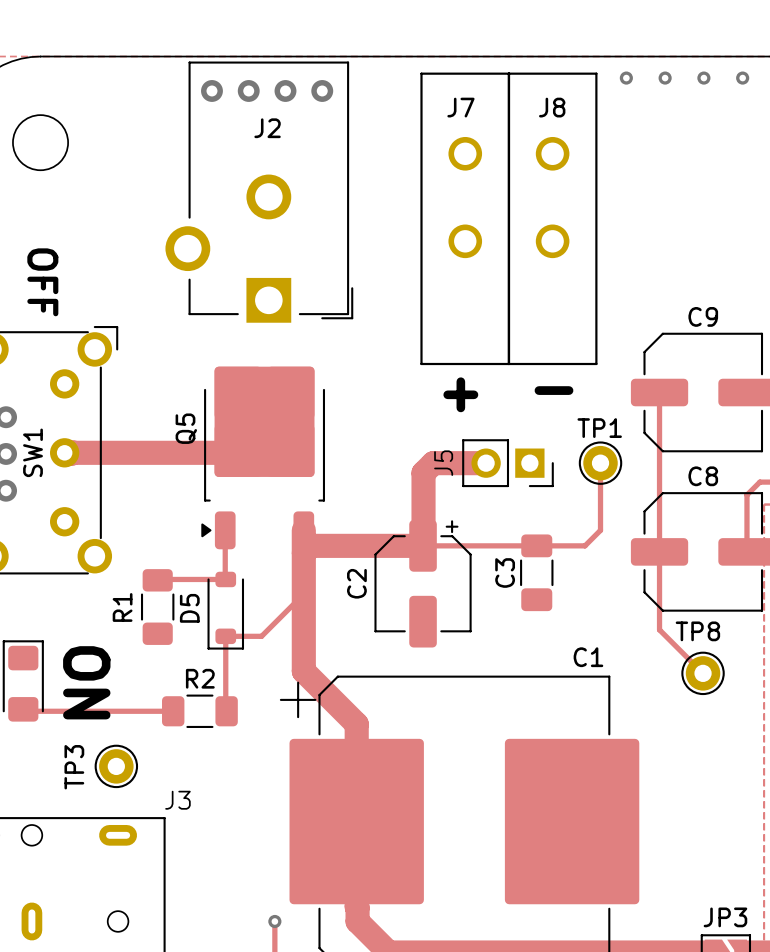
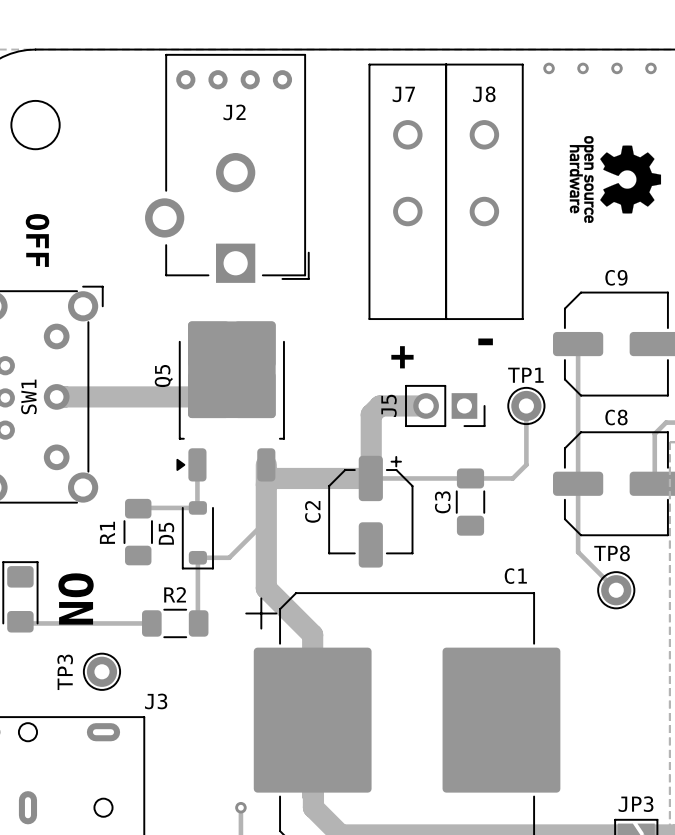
drawing: none -> [569, 136, 662, 224]

